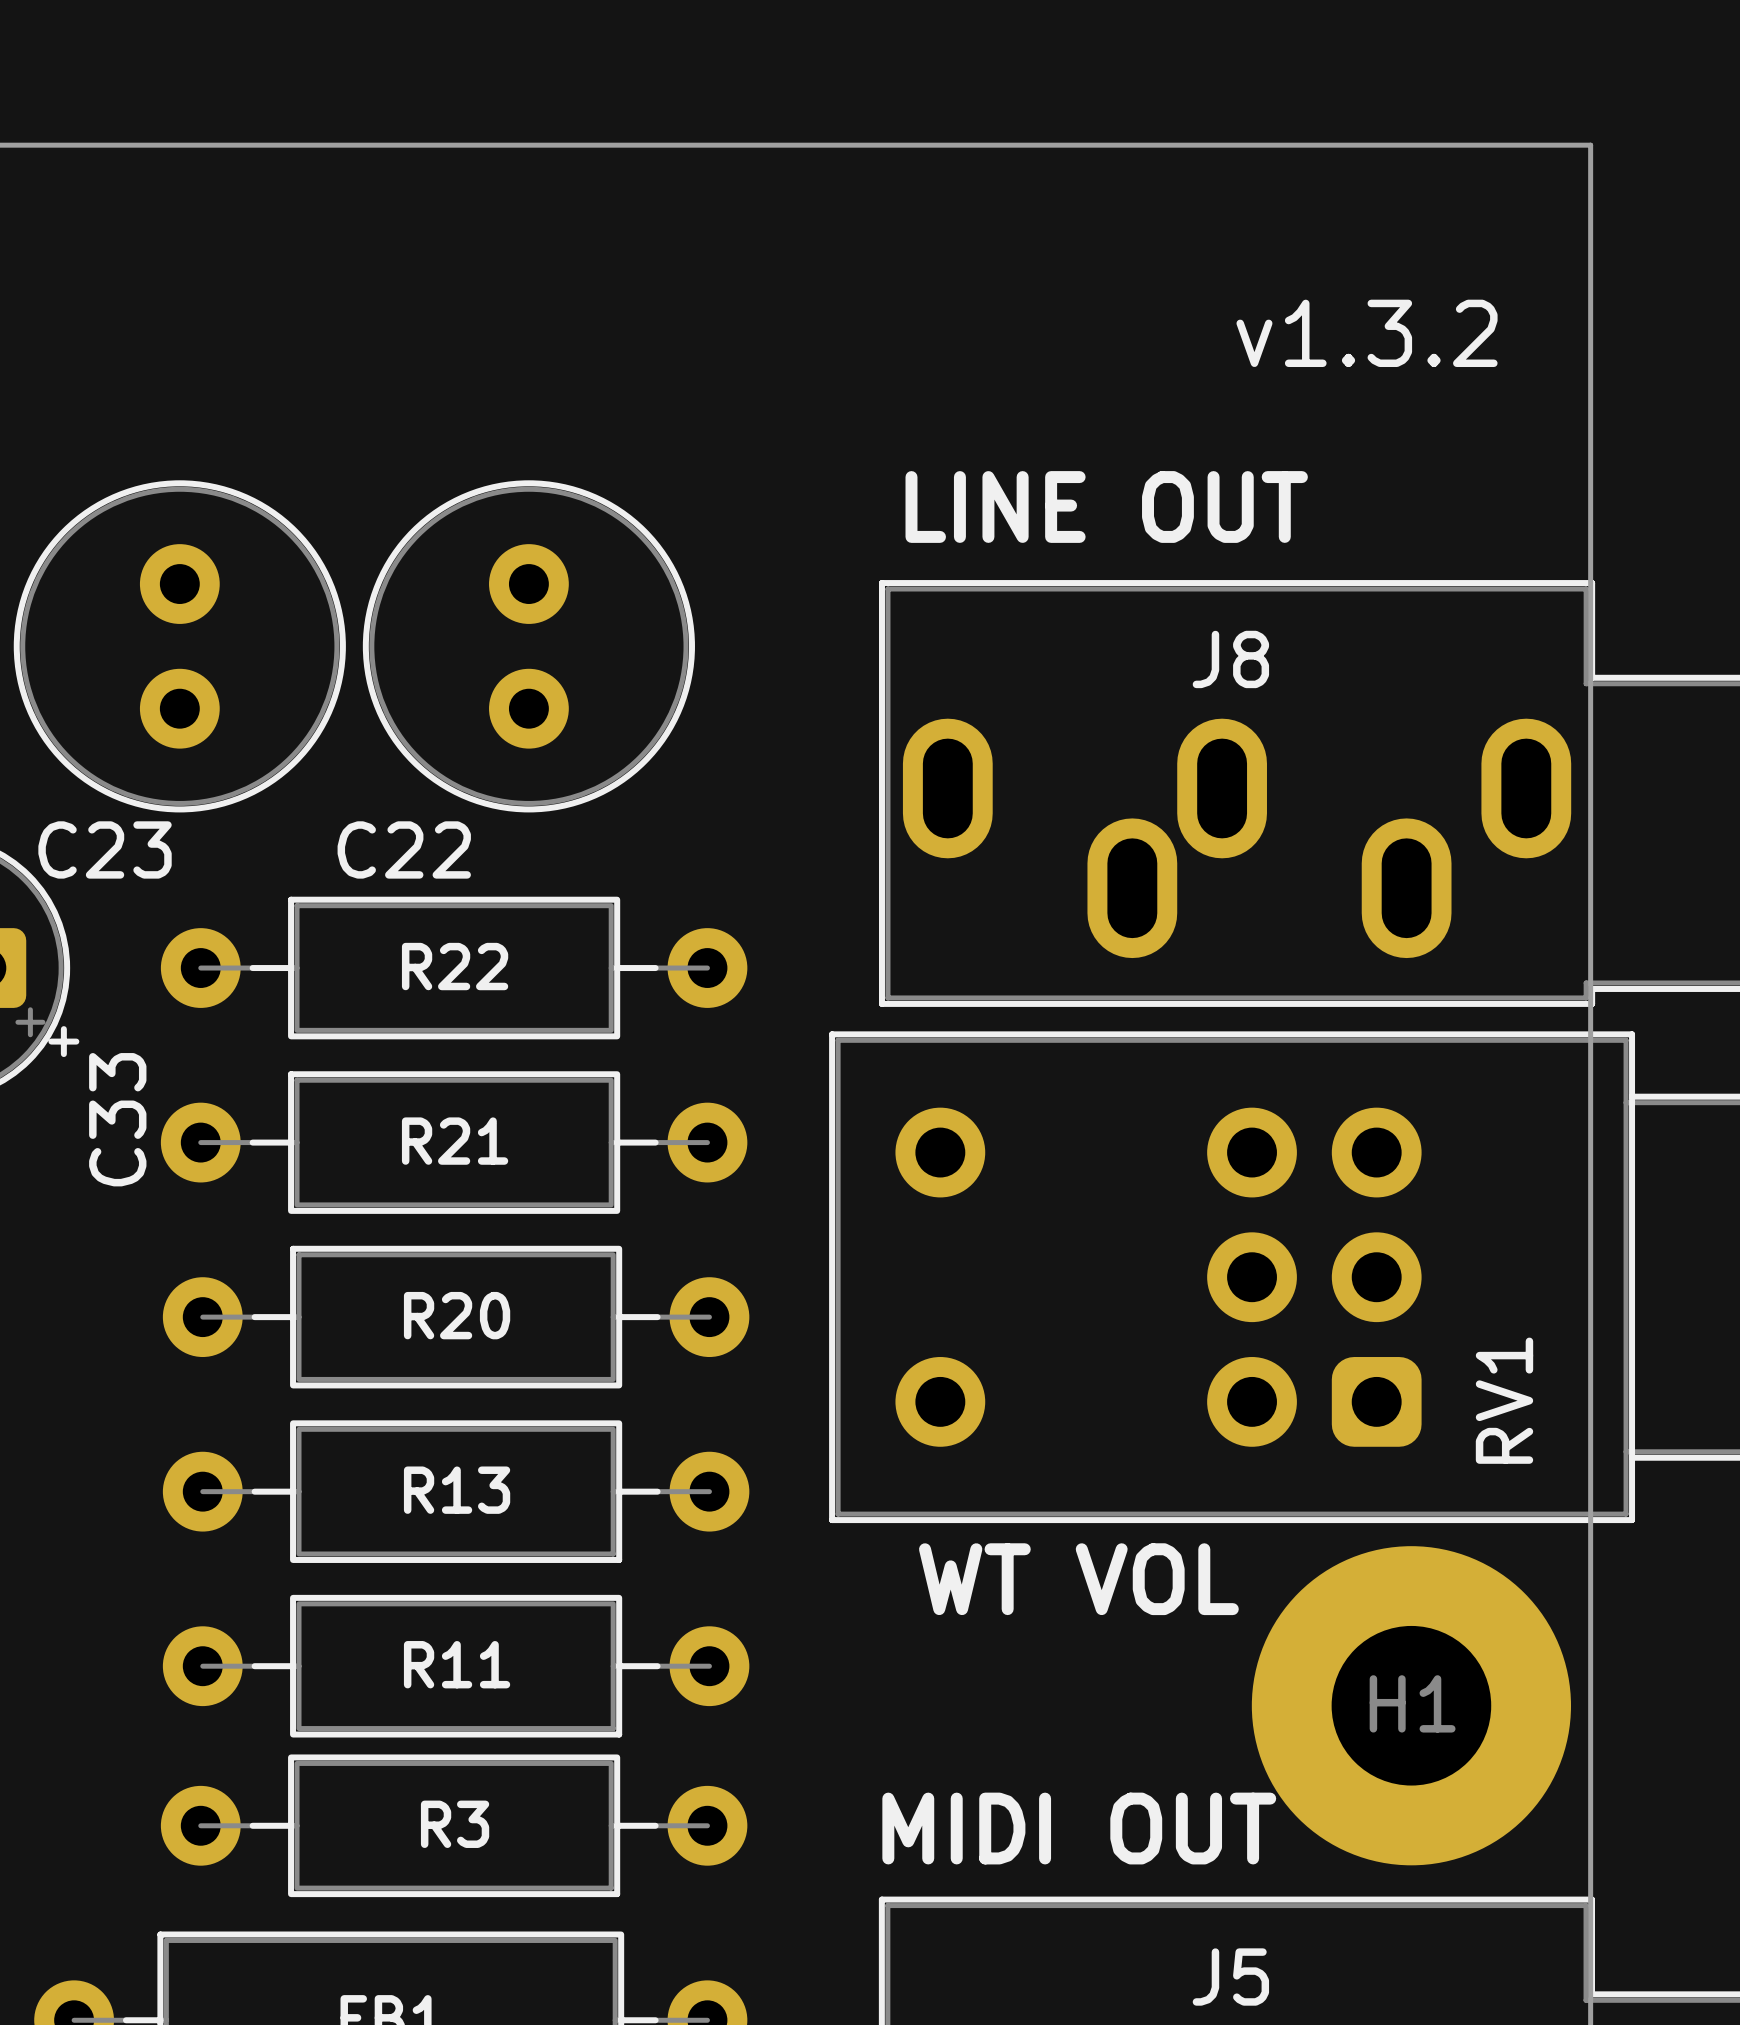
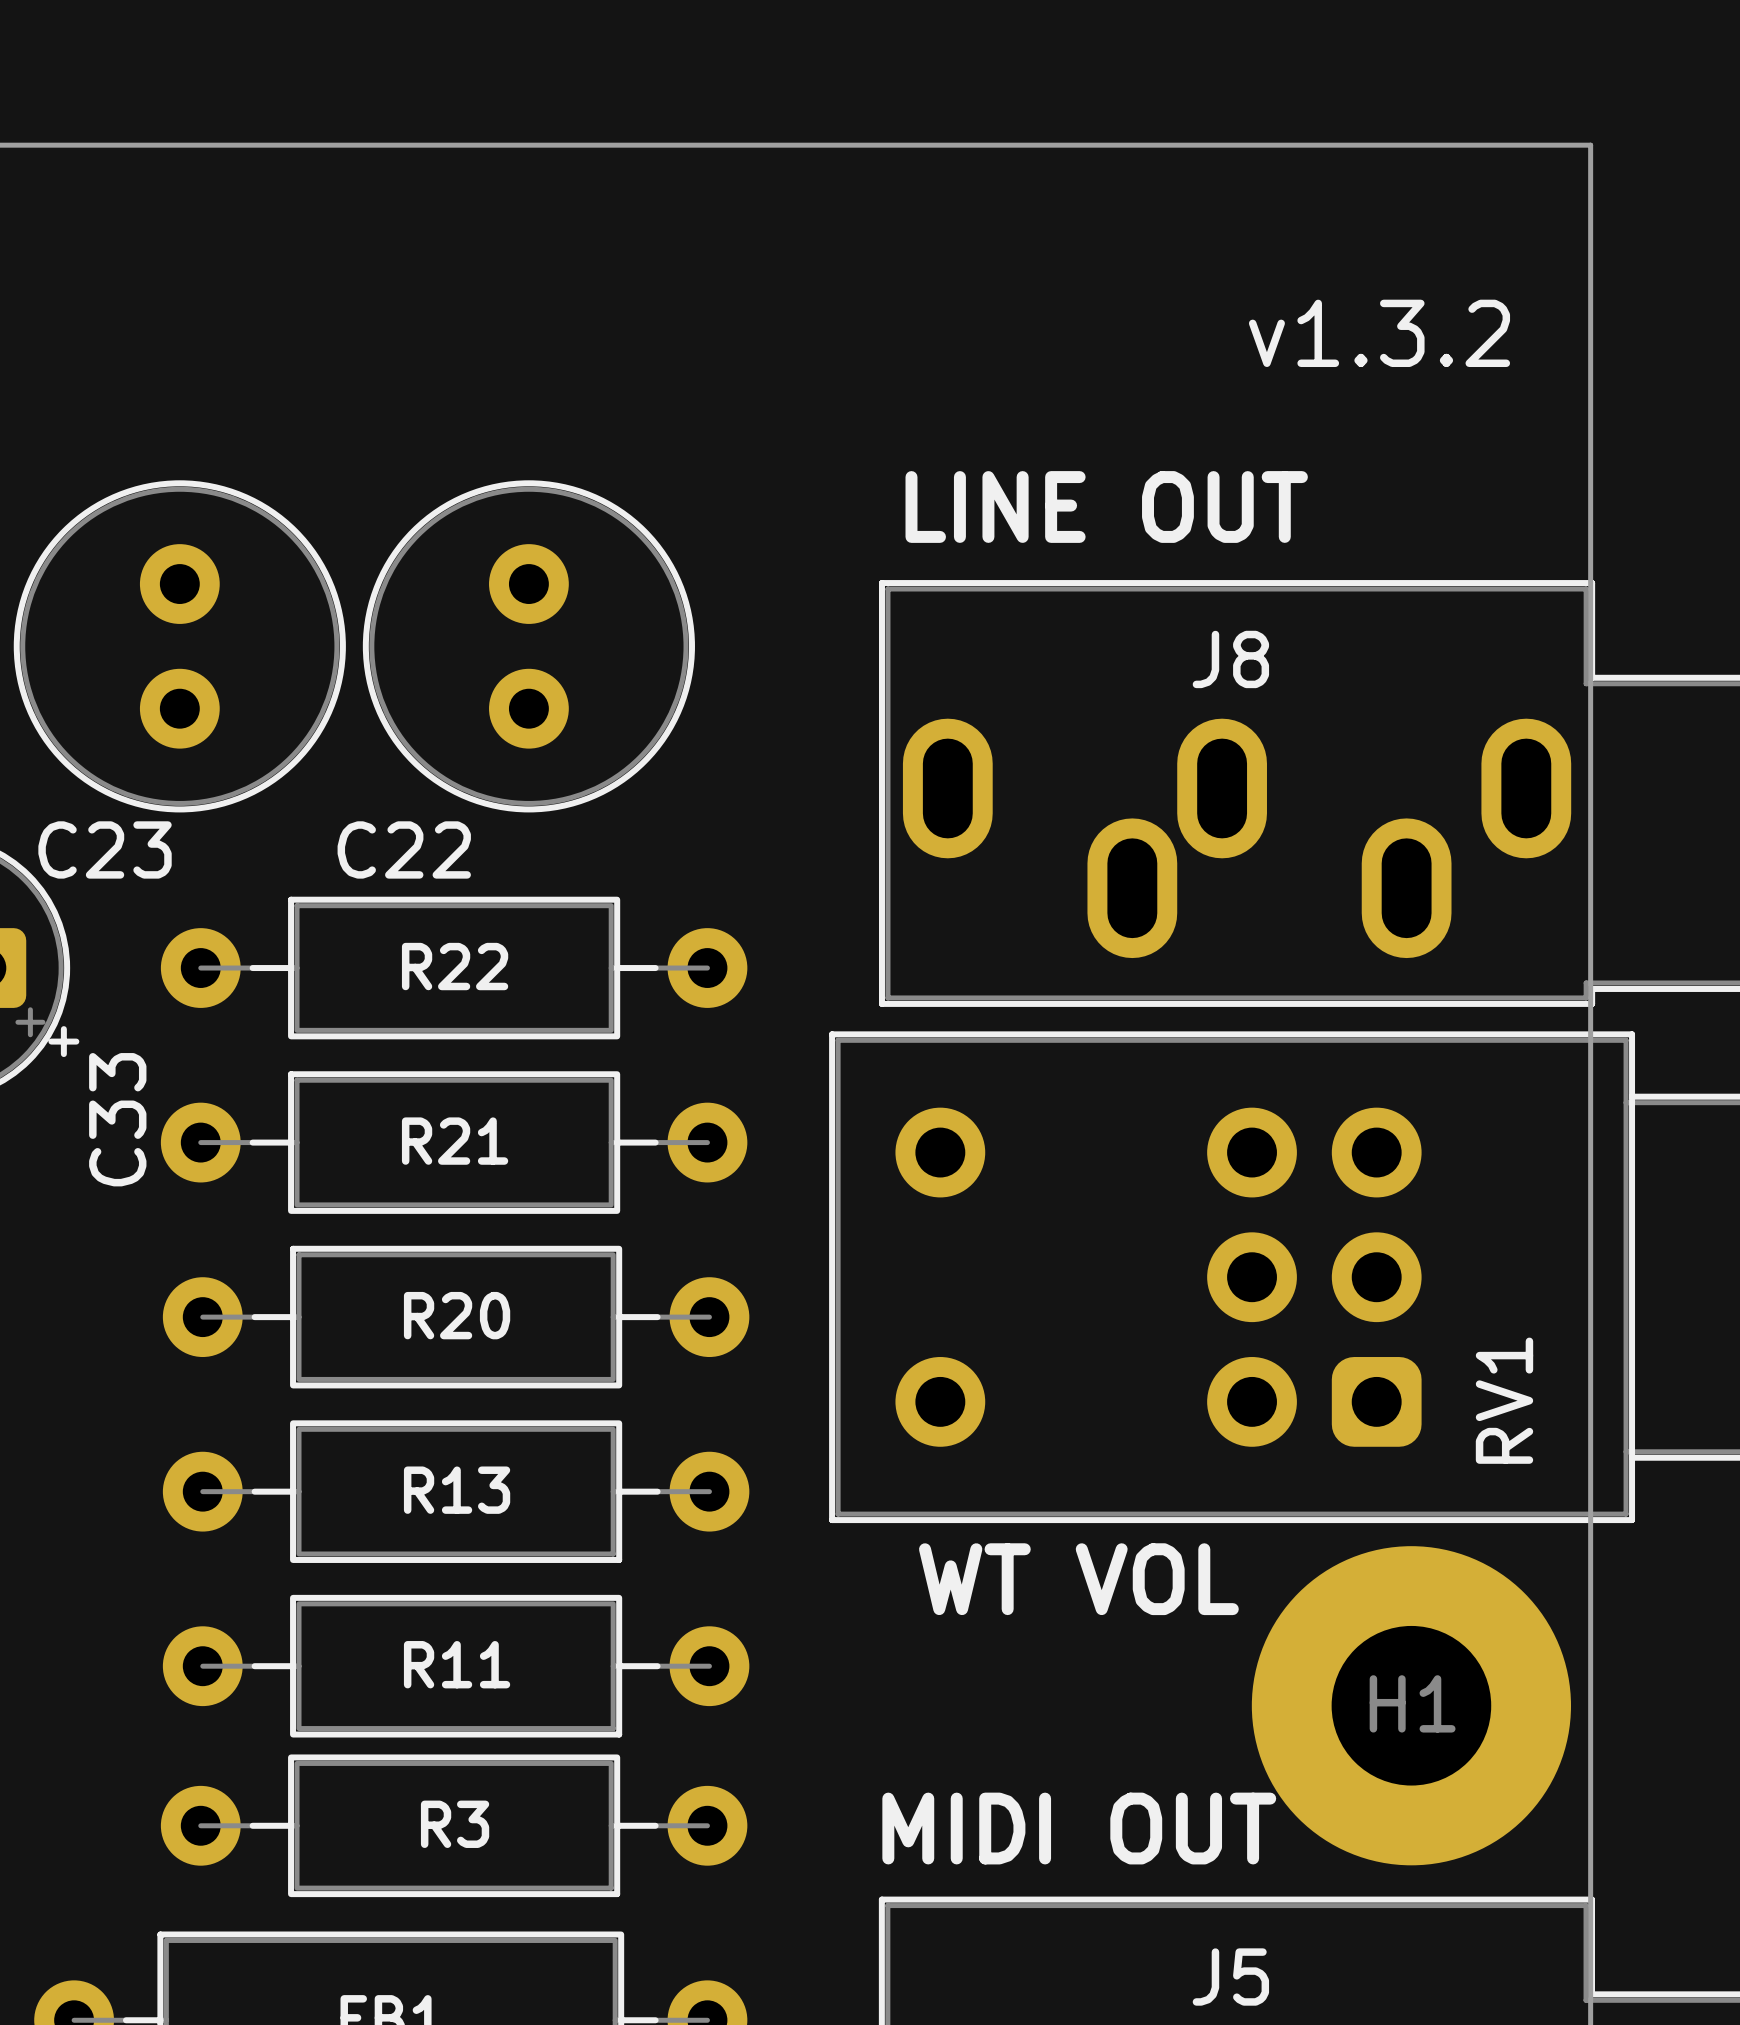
text position: v1.3.2 (1367, 333) -> v1.3.2 (1379, 333)

